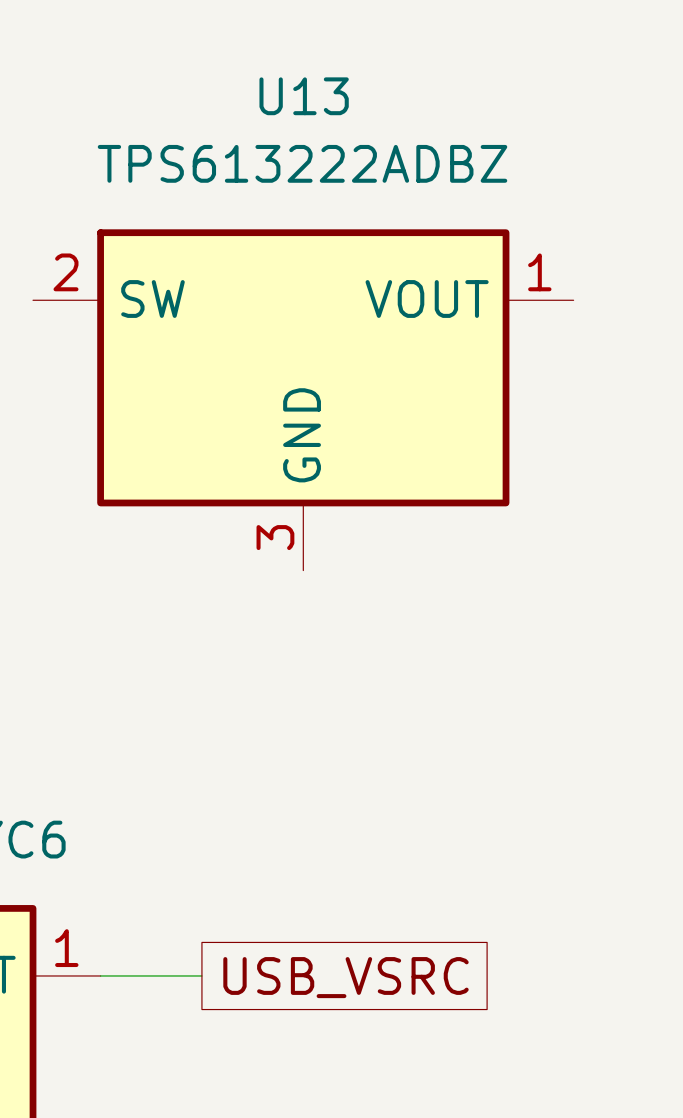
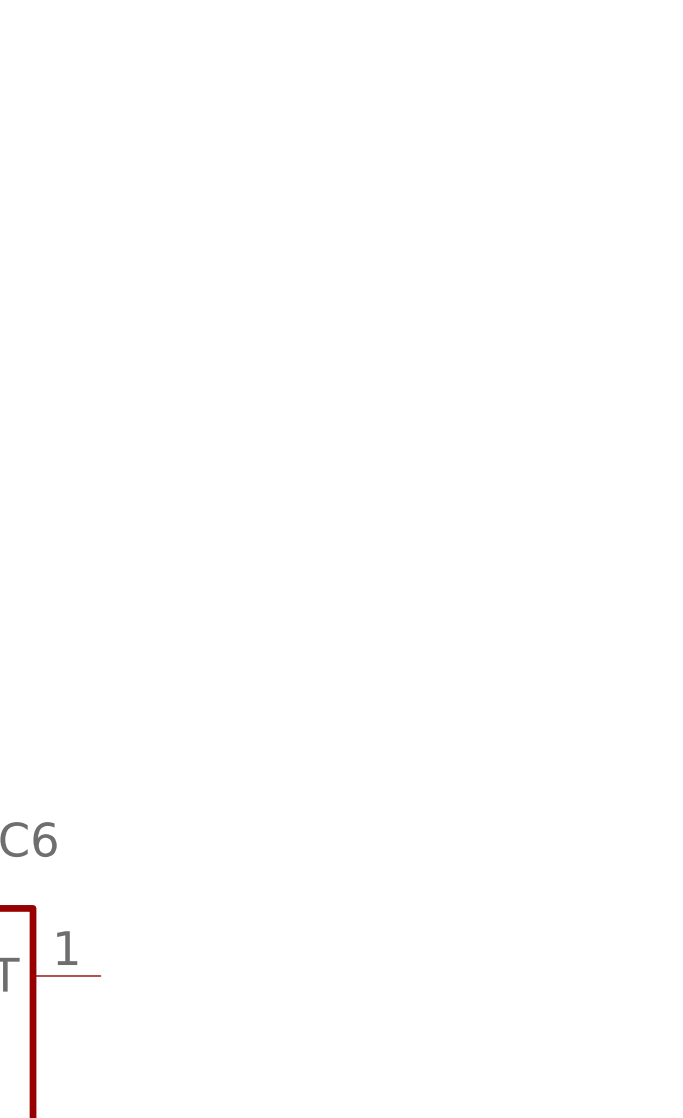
U13: TPS613222ADBZ (303, 399) -> none
wire: (100, 975) (201, 975) -> none
global label: USB_VSRC (346, 977) -> none

